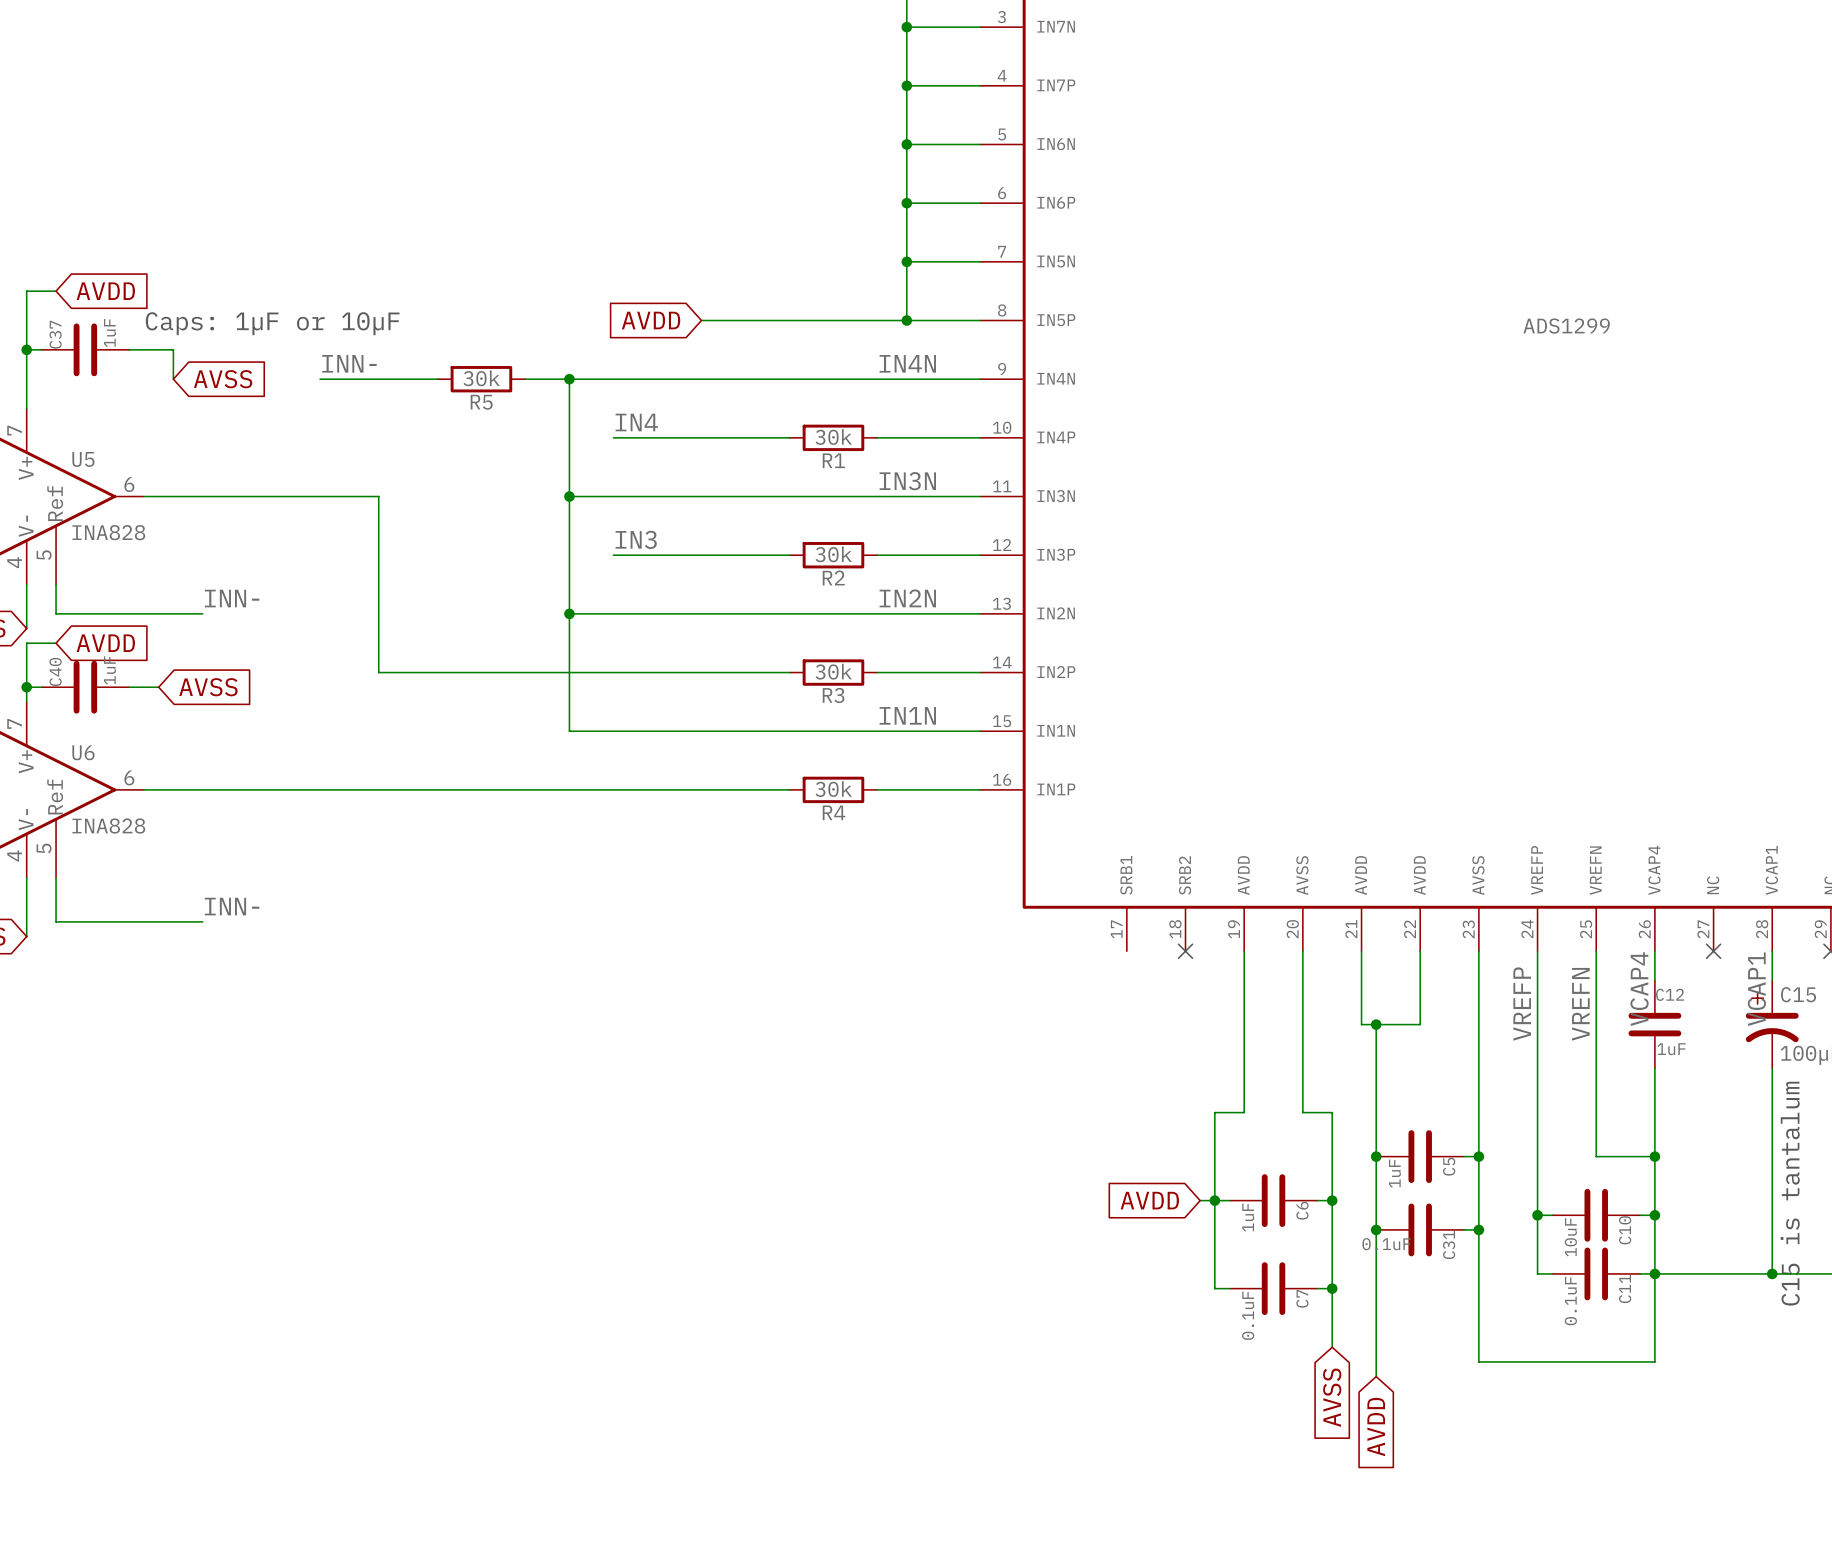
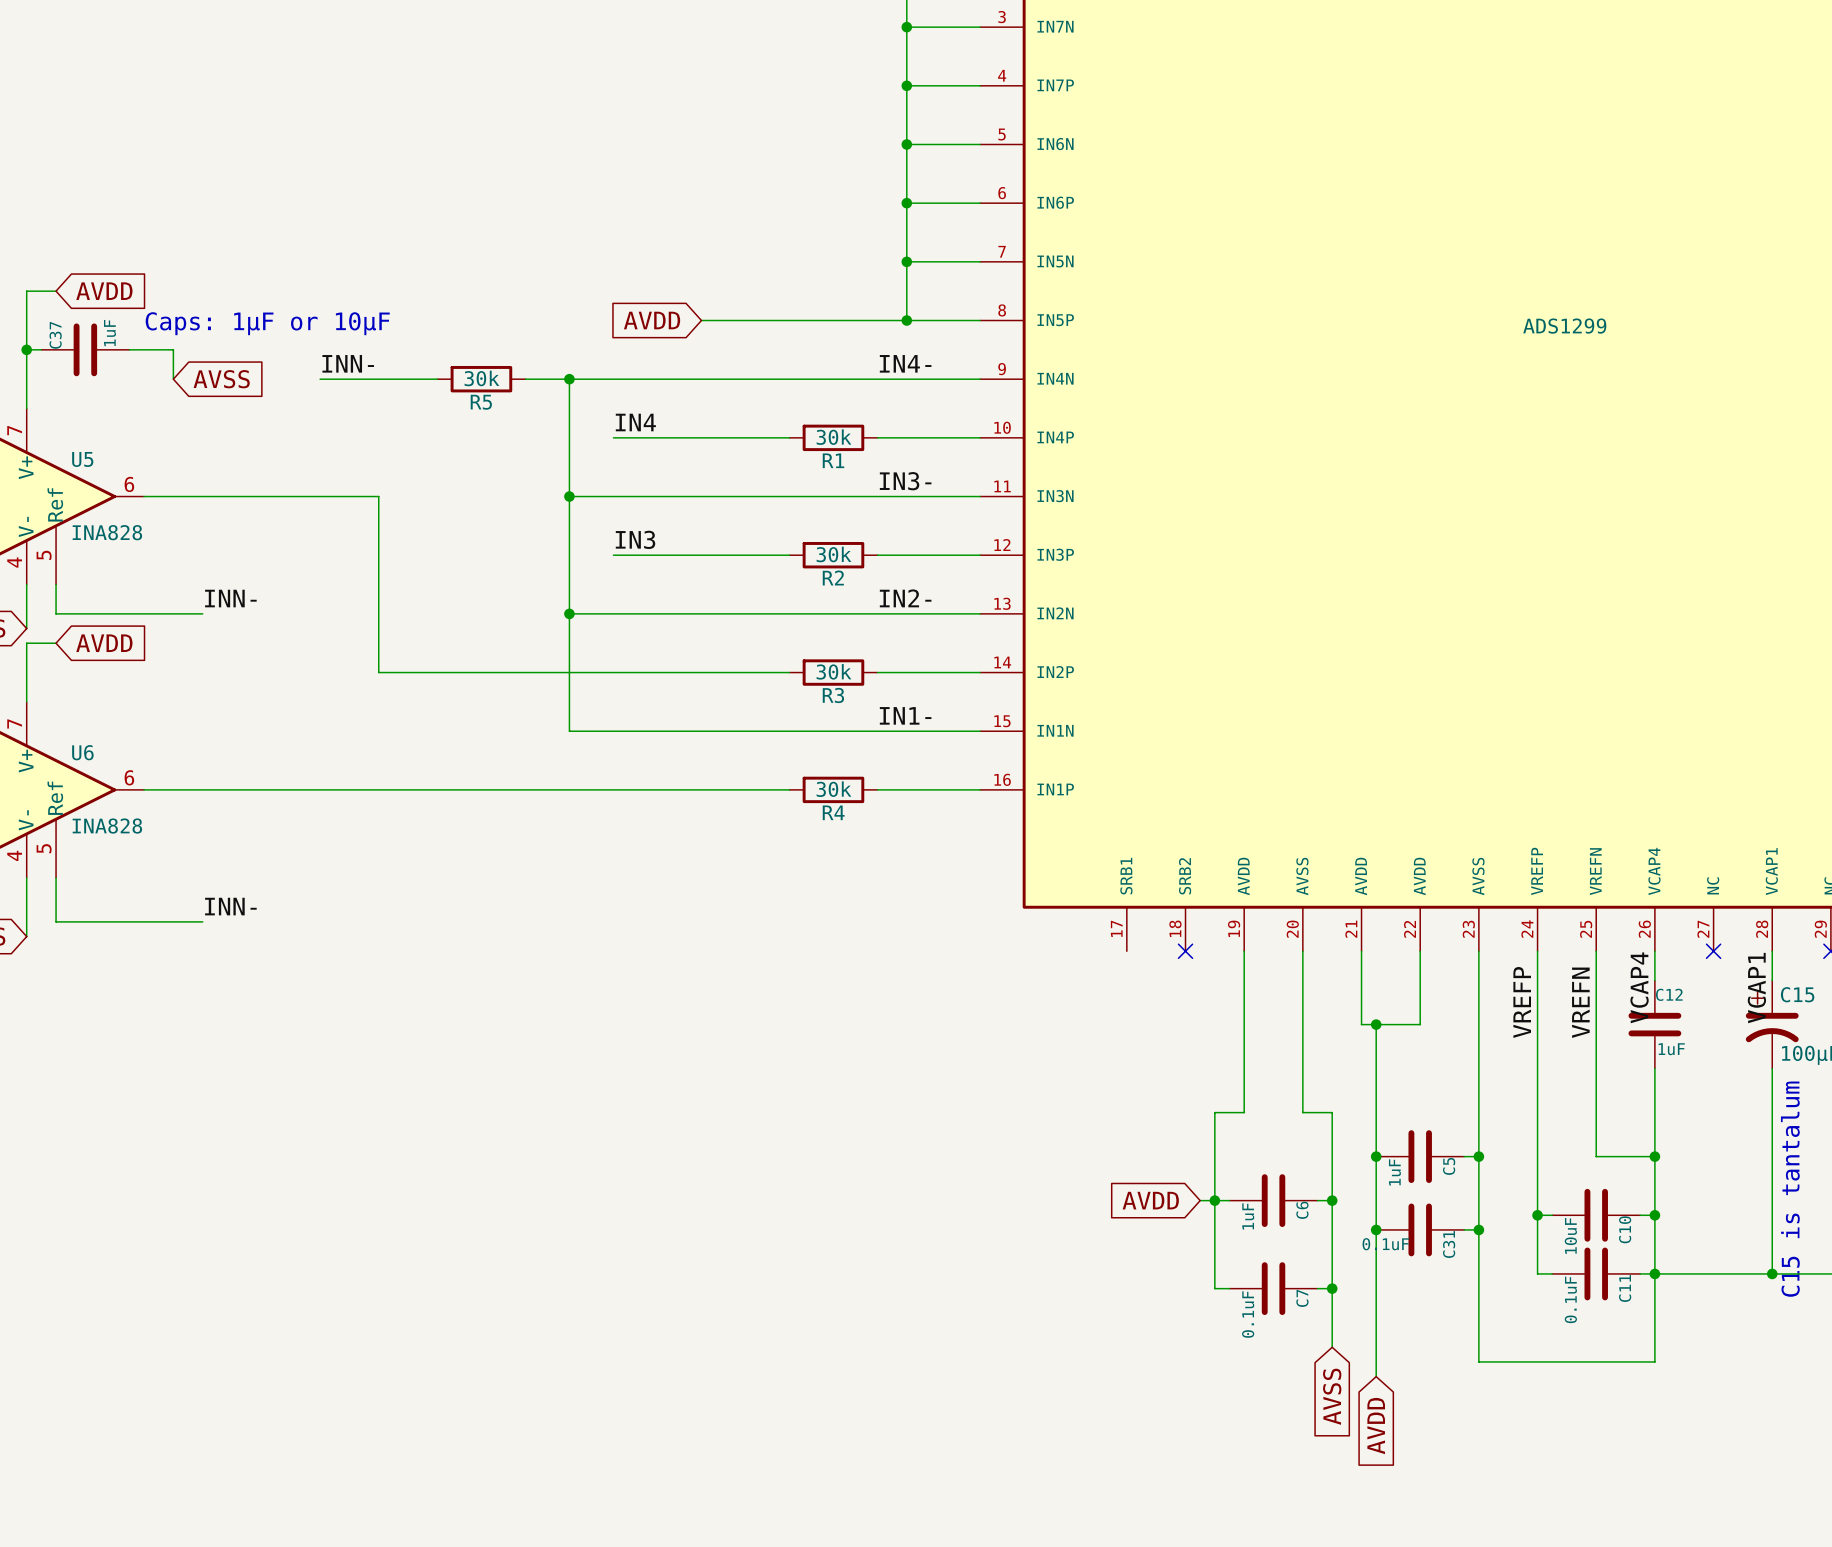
label: IN4N (907, 363) -> IN4- (905, 363)
label: IN3N (907, 481) -> IN3- (905, 481)
label: IN2N (907, 598) -> IN2- (905, 598)
wire: (26, 687) (41, 687) -> none
junction: (26, 687) -> none
C40: 1uF (85, 687) -> none
wire: (129, 687) (158, 687) -> none
global label: AVSS (208, 687) -> none
label: IN1N (907, 715) -> IN1- (905, 715)

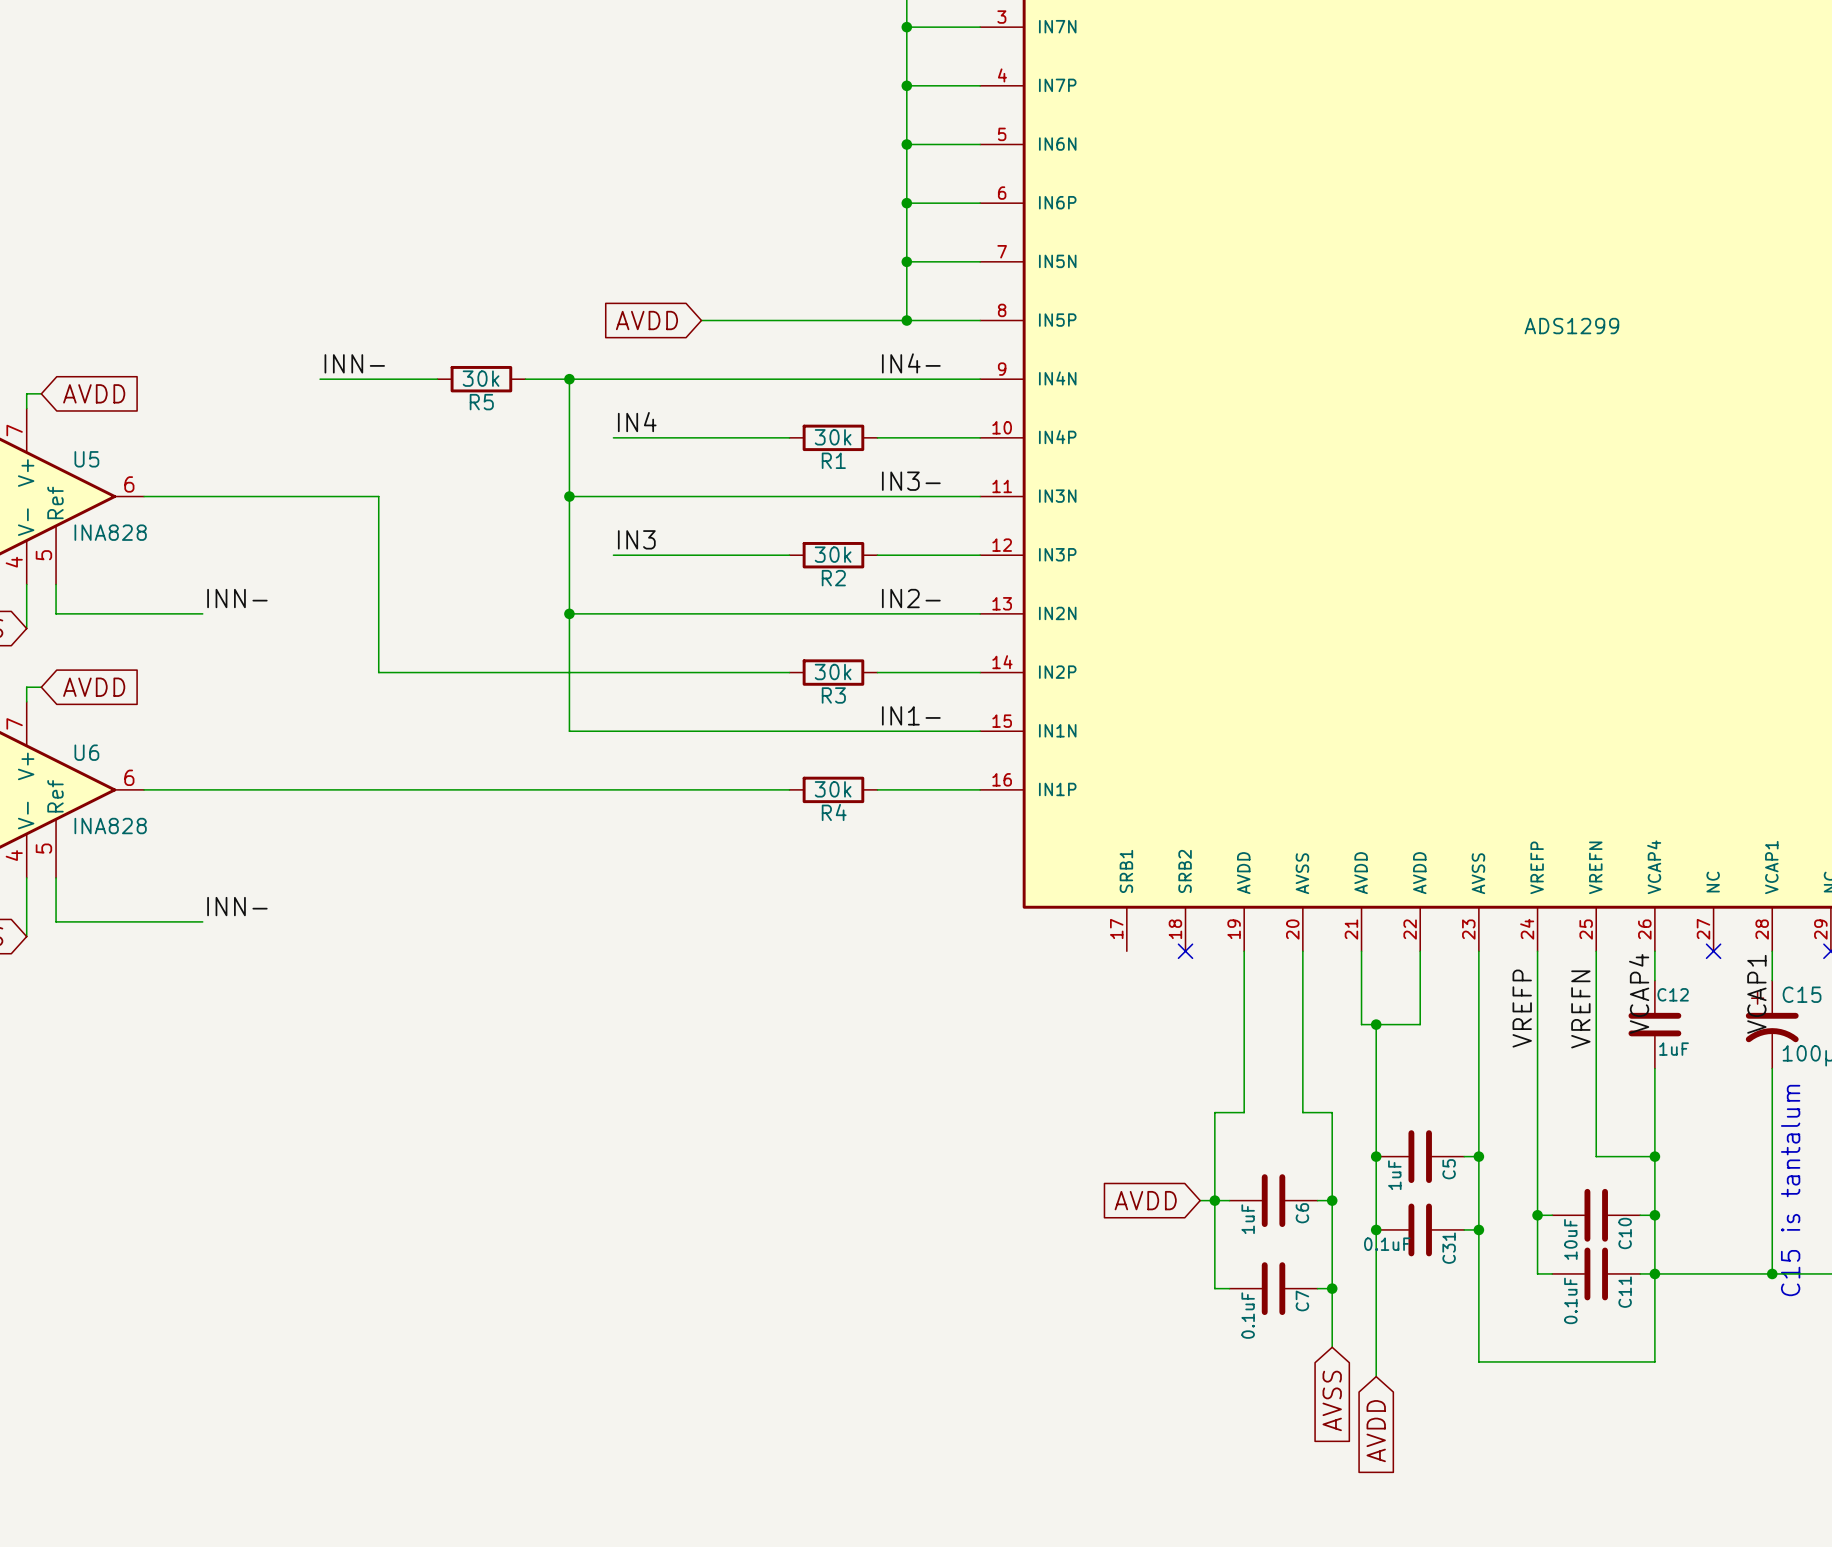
wire: (56, 291) (26, 291) (26, 393) -> (41, 393) (26, 393)
global label position: AVDD (104, 291) -> AVDD (94, 393)
text: Caps: 1µF or 10µF (267, 323) -> none
wire: (26, 349) (41, 349) -> none
junction: (26, 349) -> none
C37: 1uF (85, 349) -> none
wire: (129, 349) (173, 349) (173, 379) -> none
global label: AVSS (221, 379) -> none
wire: (56, 643) (26, 643) (26, 687) -> (41, 687) (26, 687)
global label position: AVDD (104, 643) -> AVDD (94, 687)

